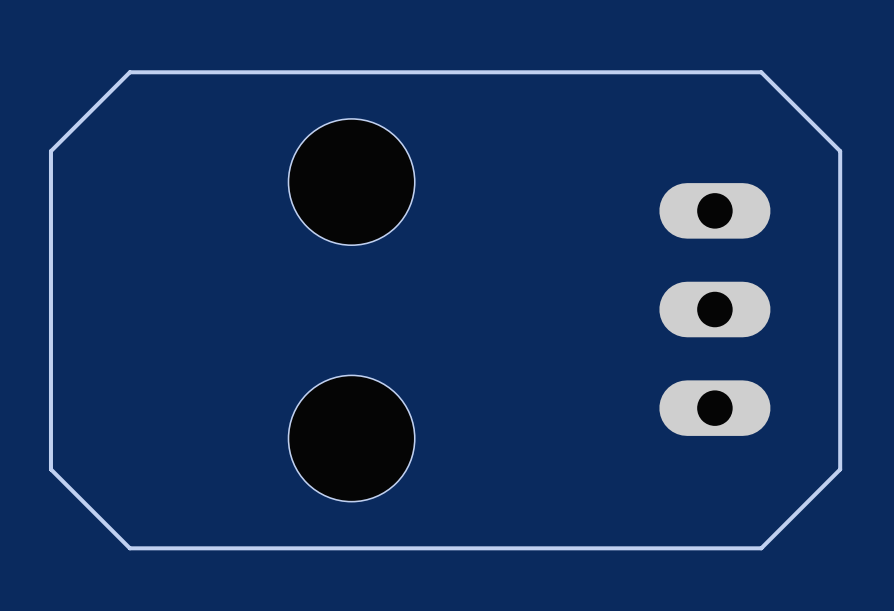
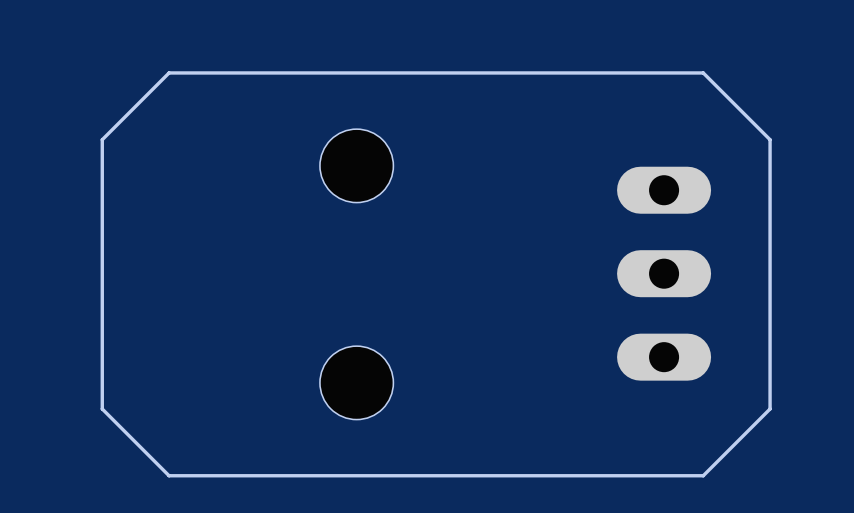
hole size: [288, 118, 415, 246] -> [319, 129, 394, 203]
hole size: [288, 375, 415, 502] -> [319, 346, 394, 420]

